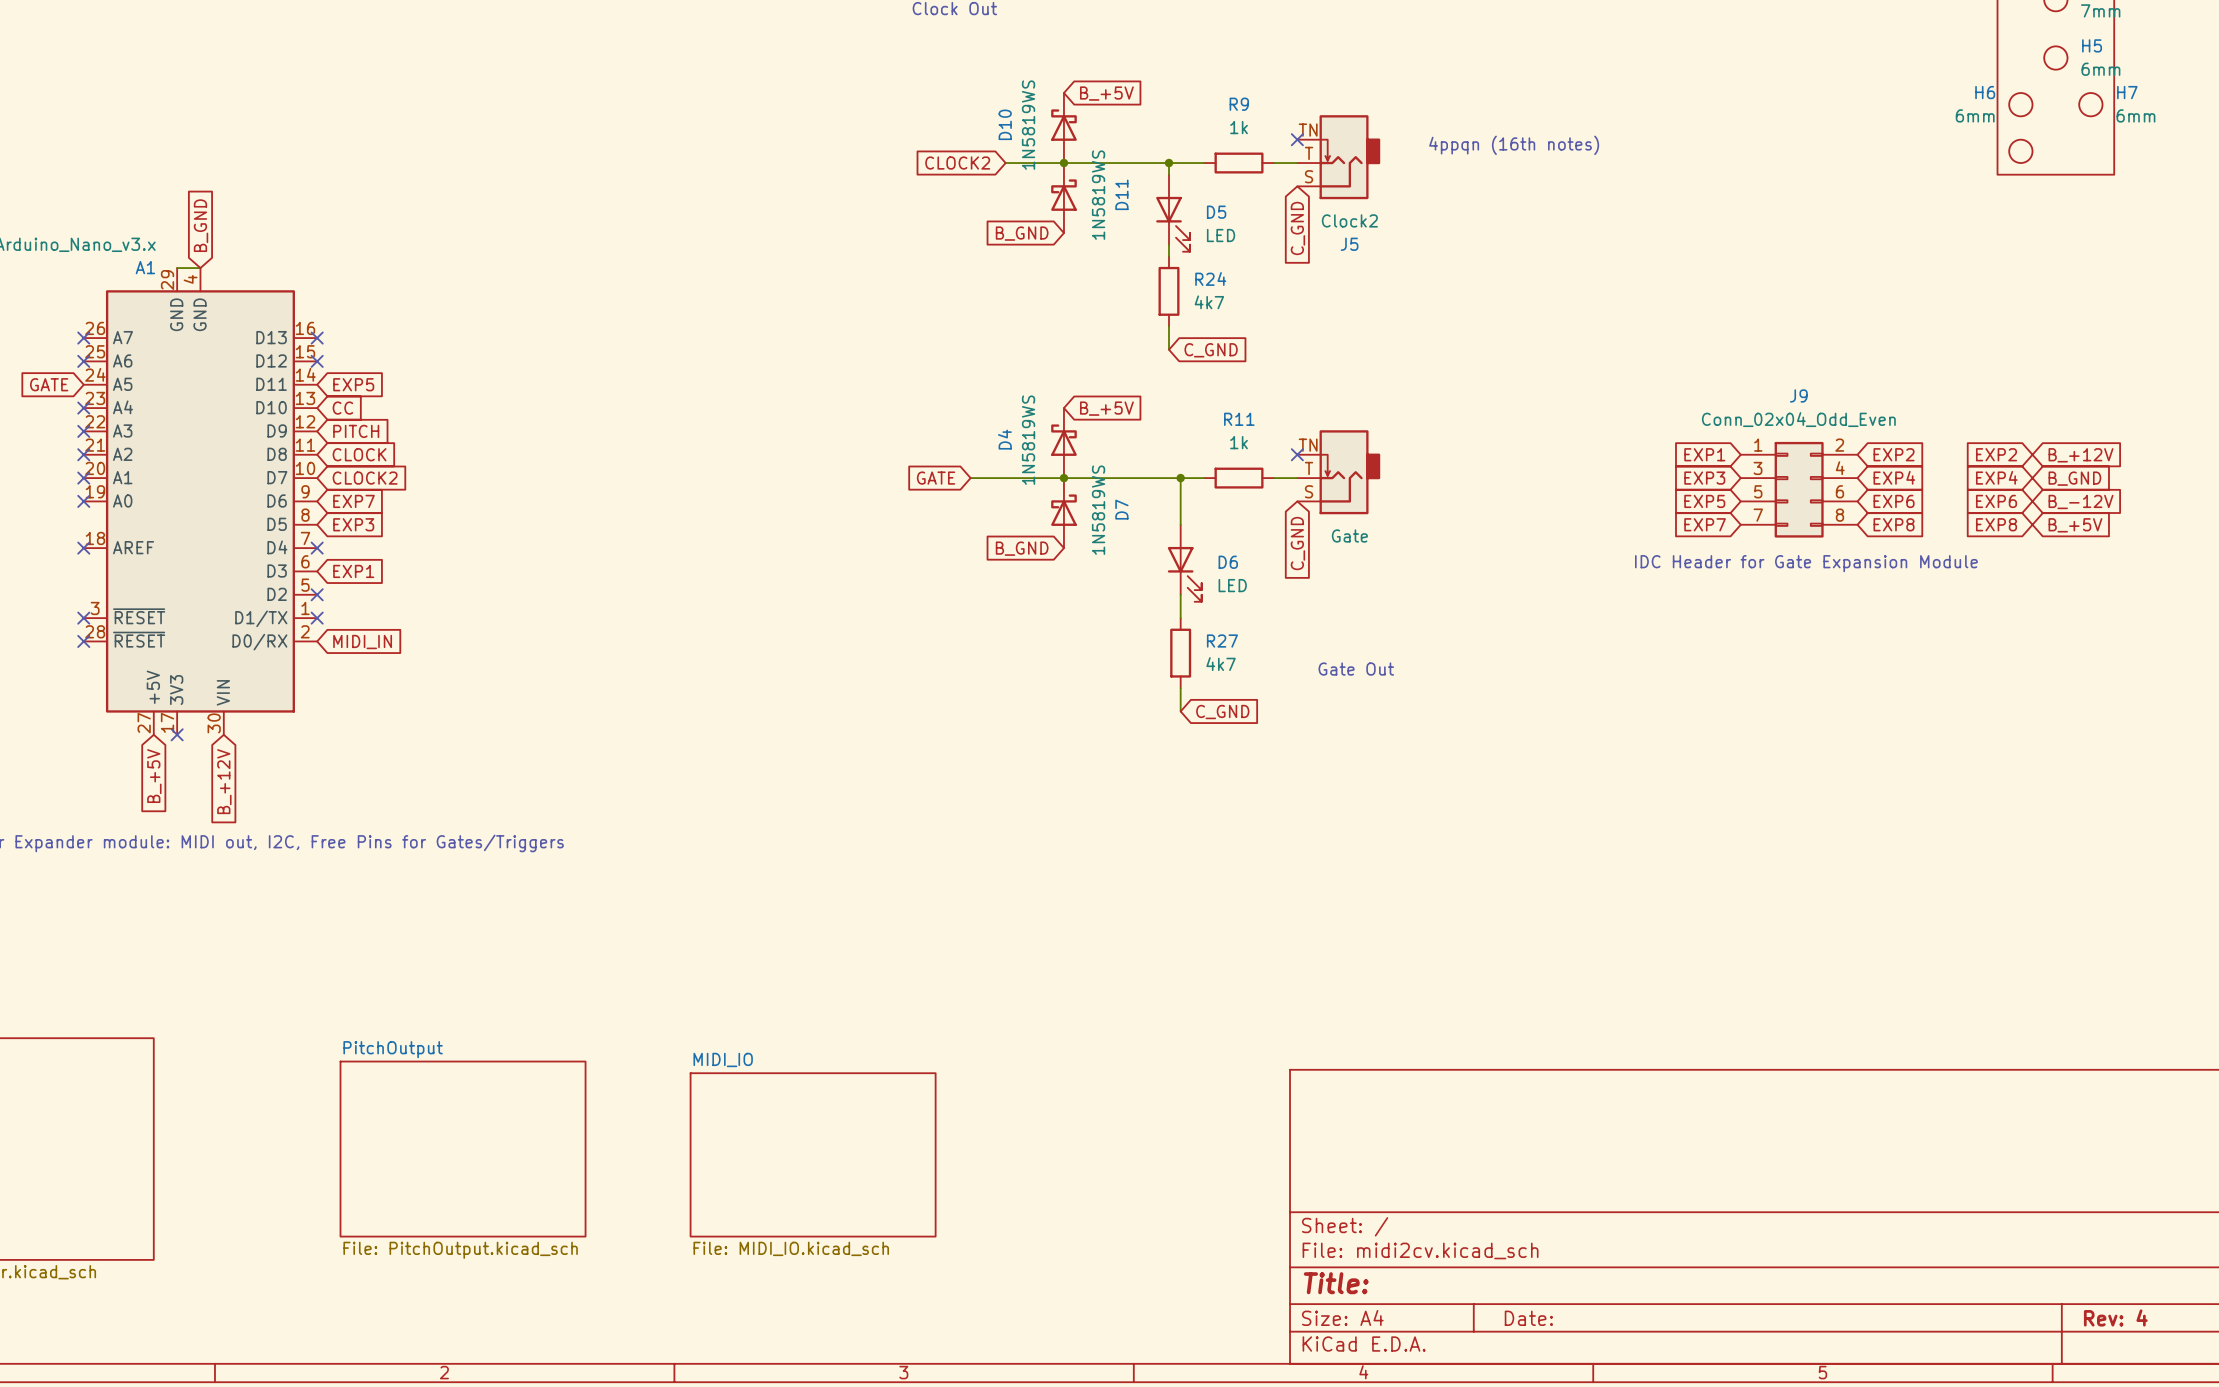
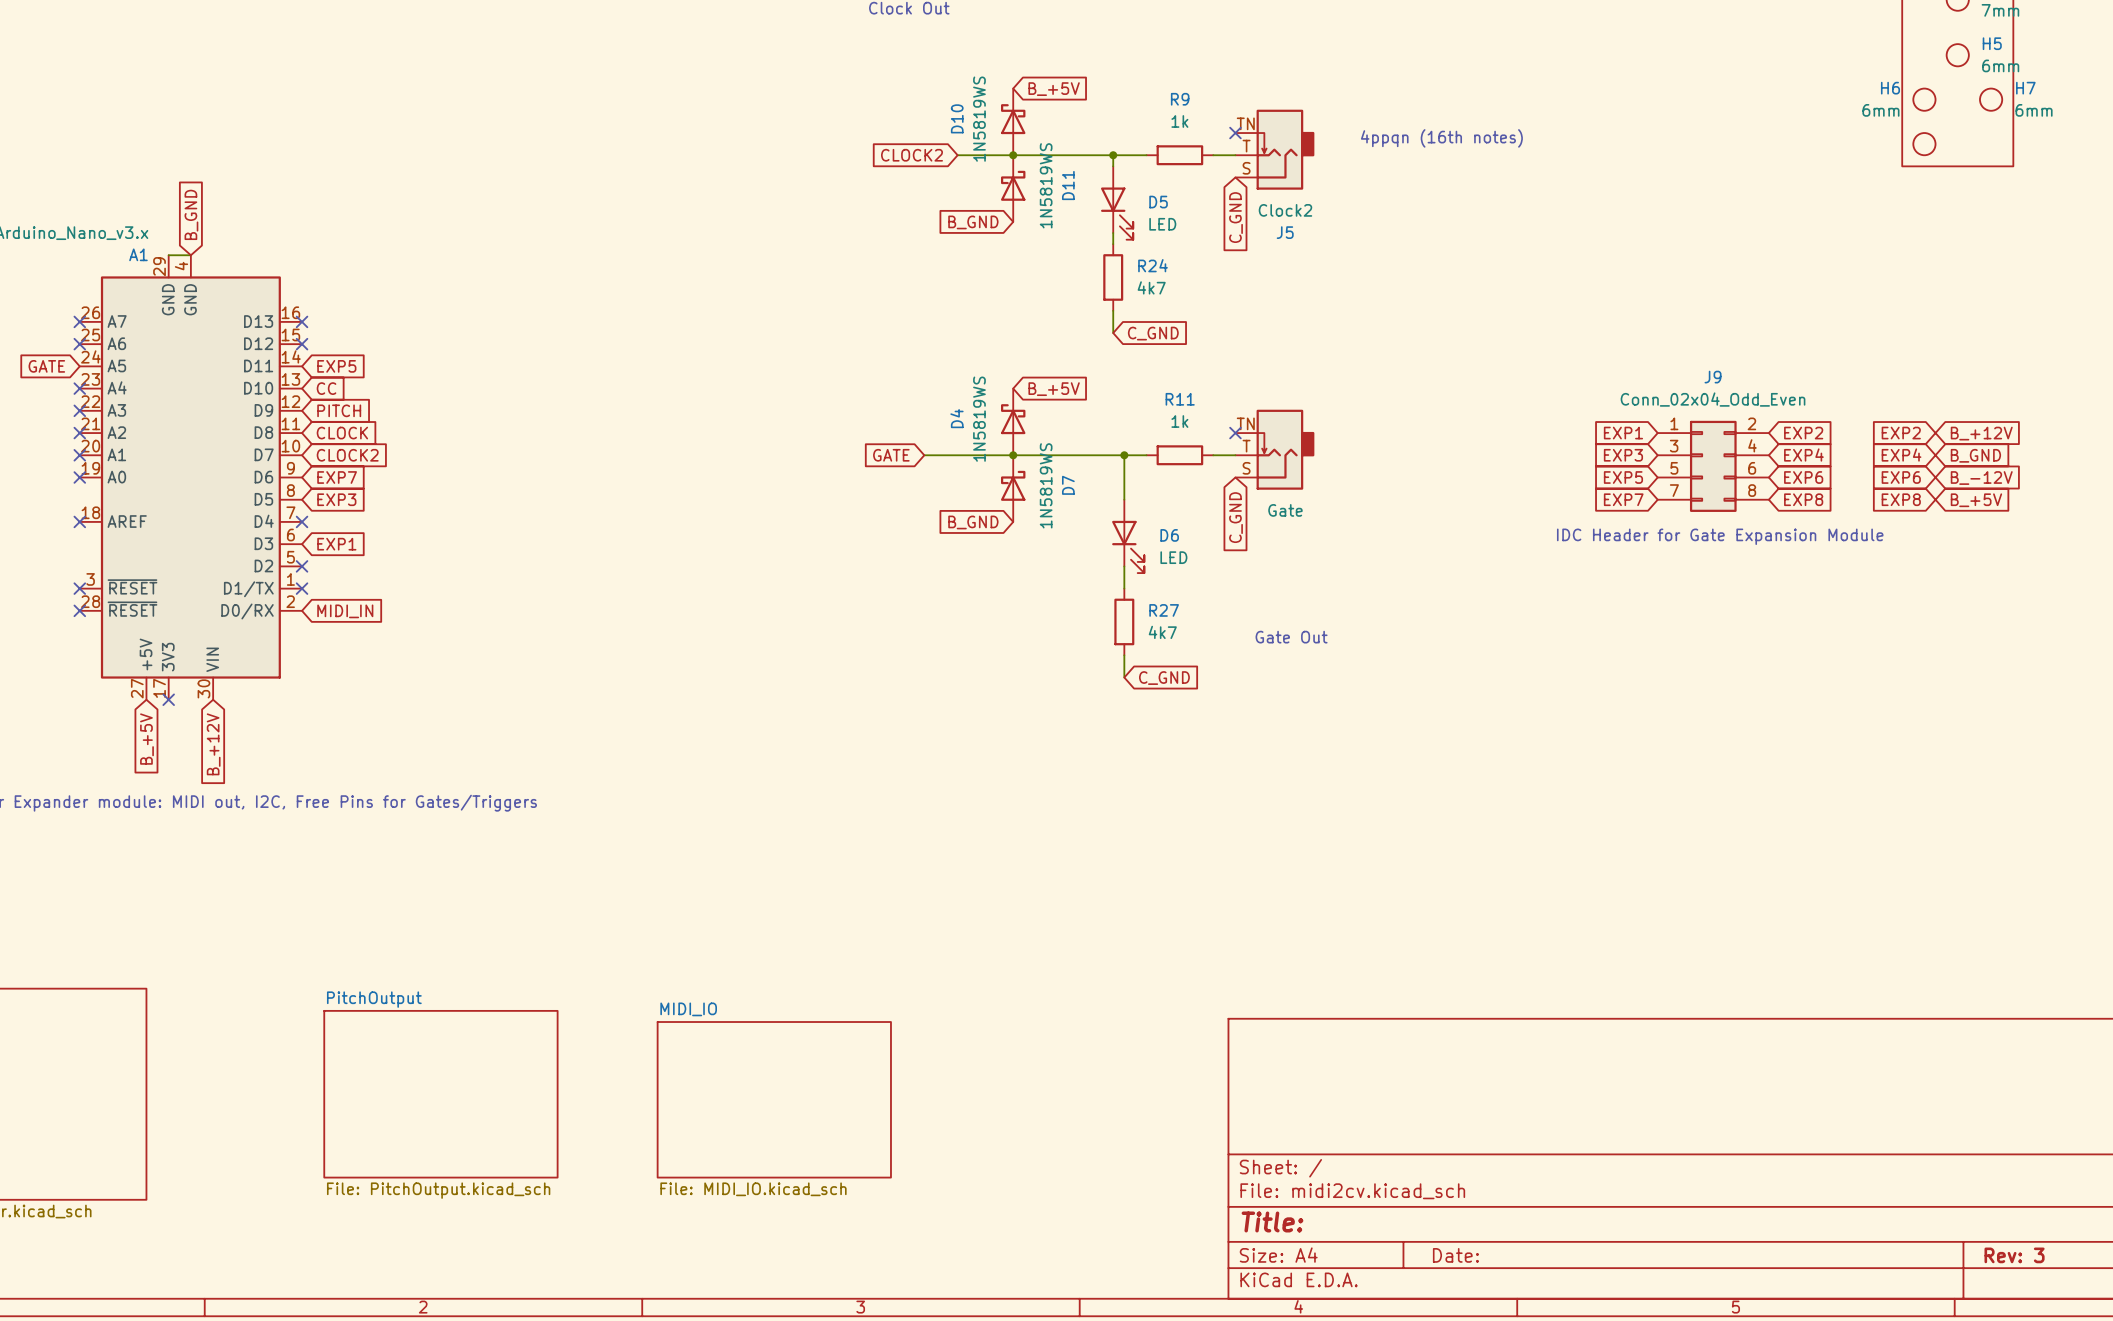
title block: Rev: 4 (2115, 1317) -> Rev: 3 (2014, 1255)

